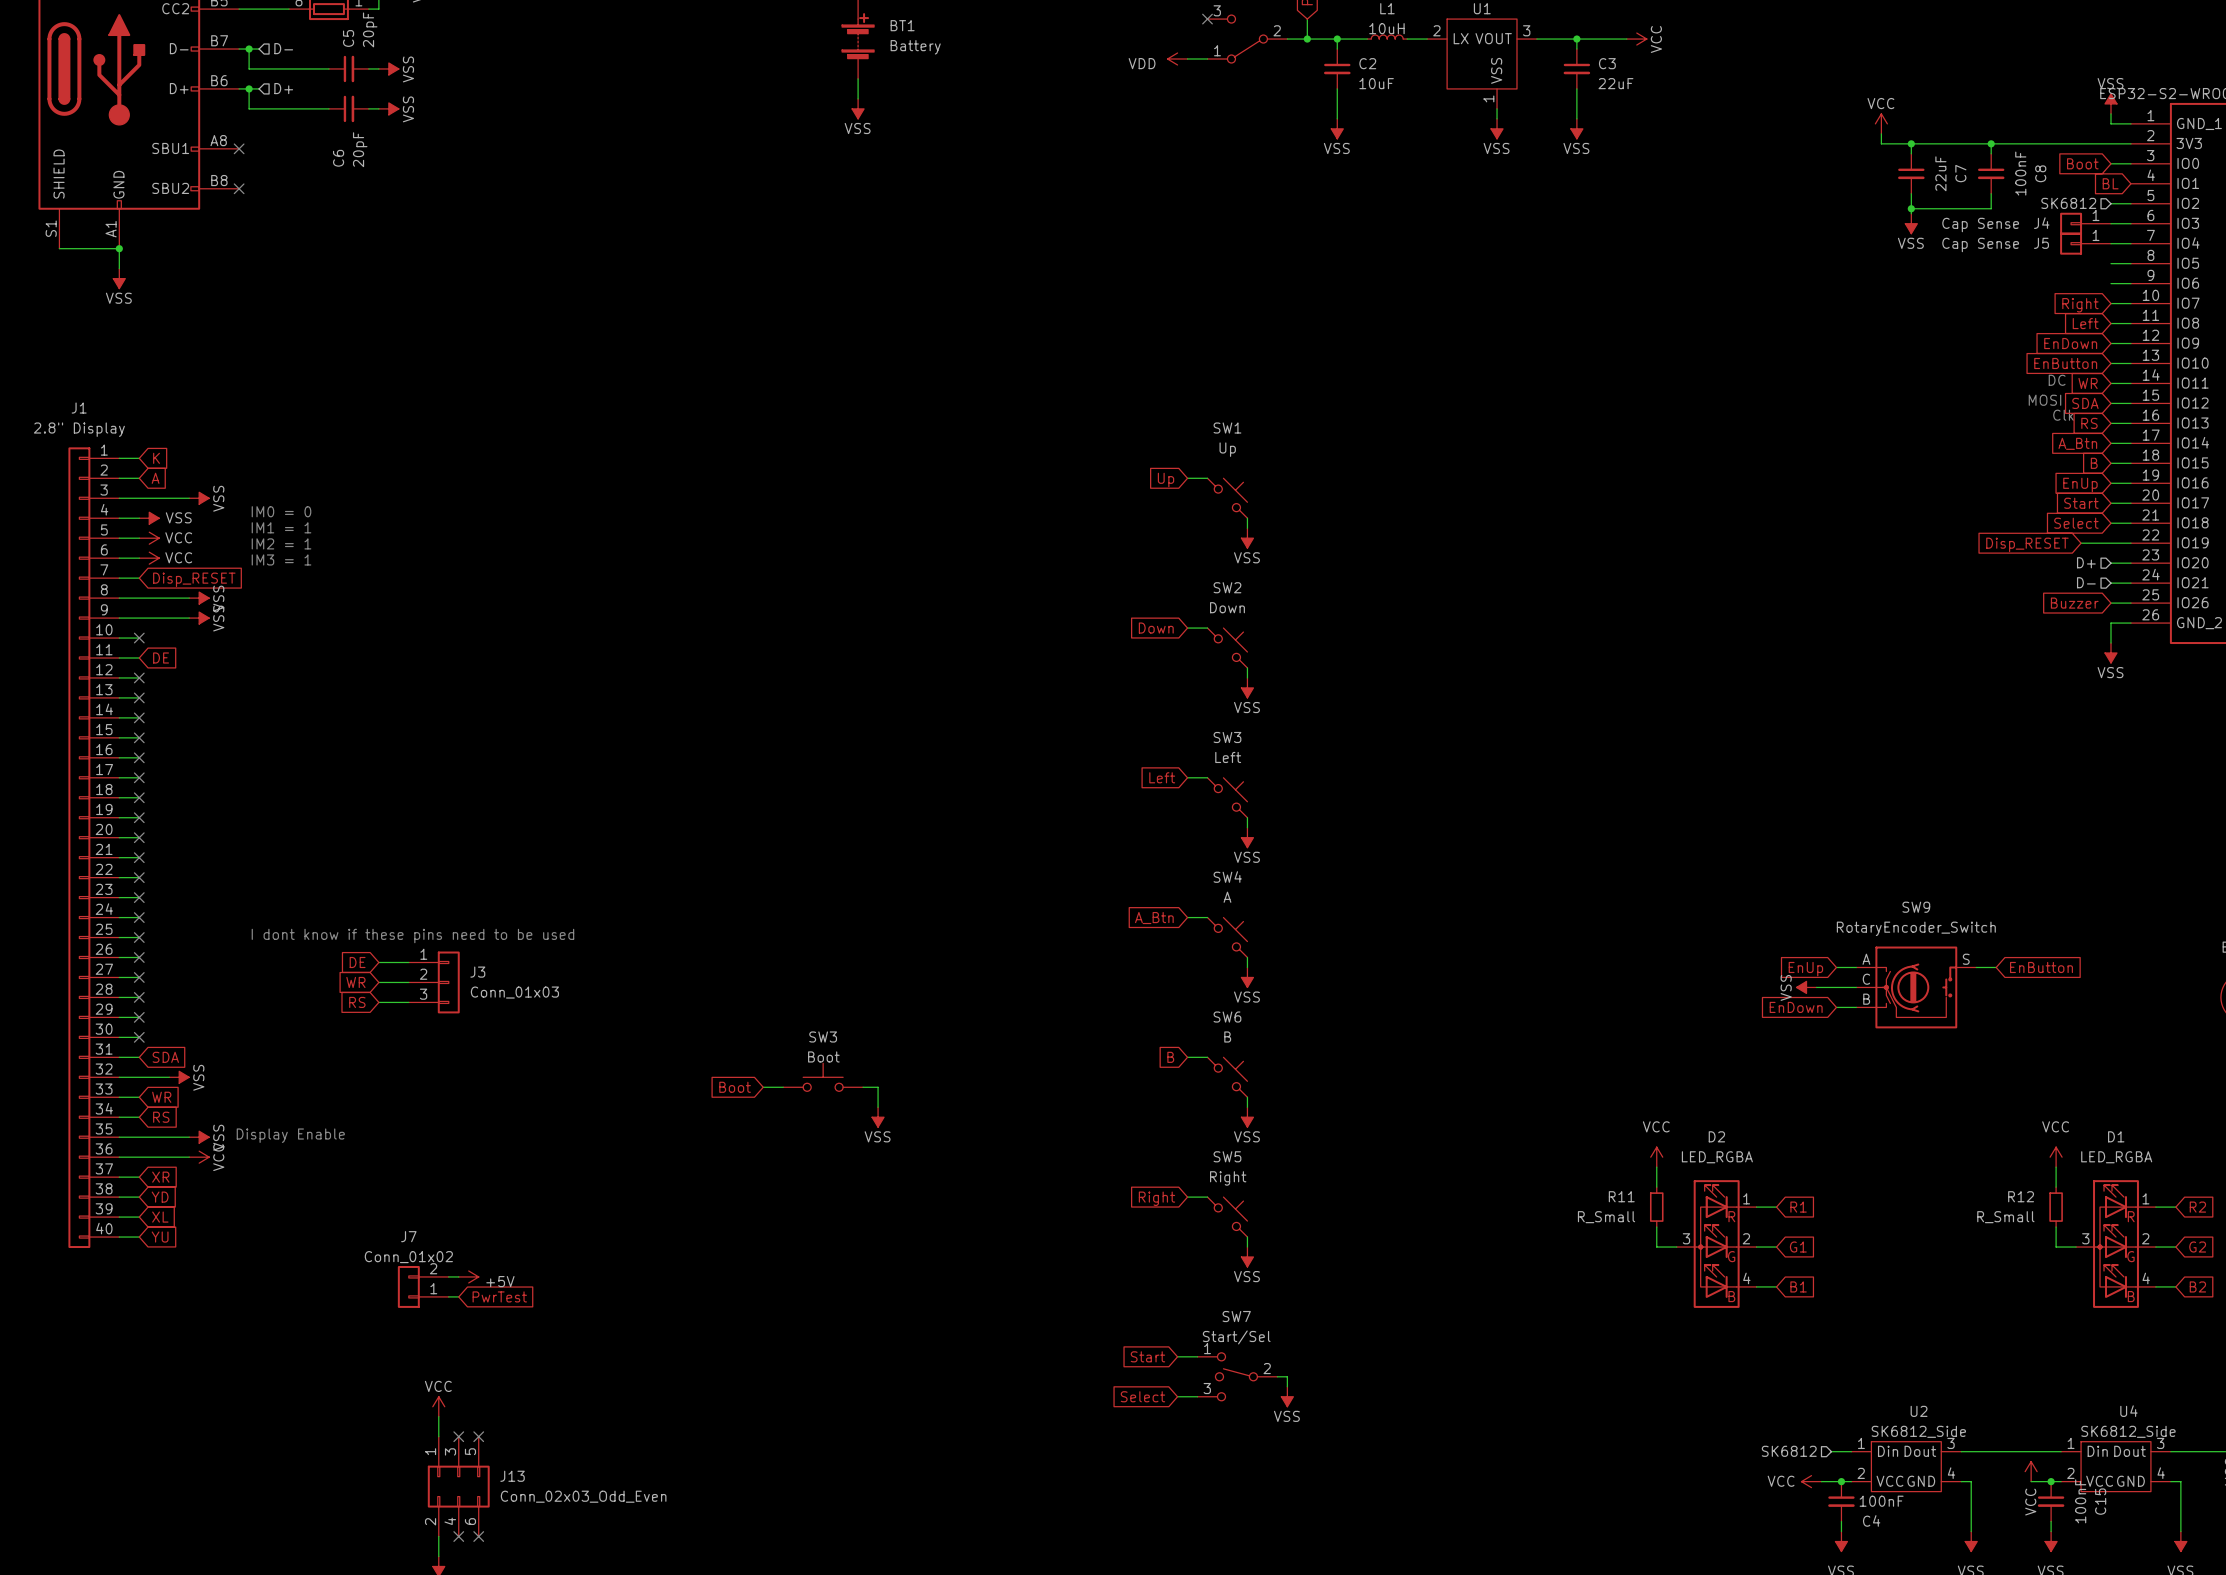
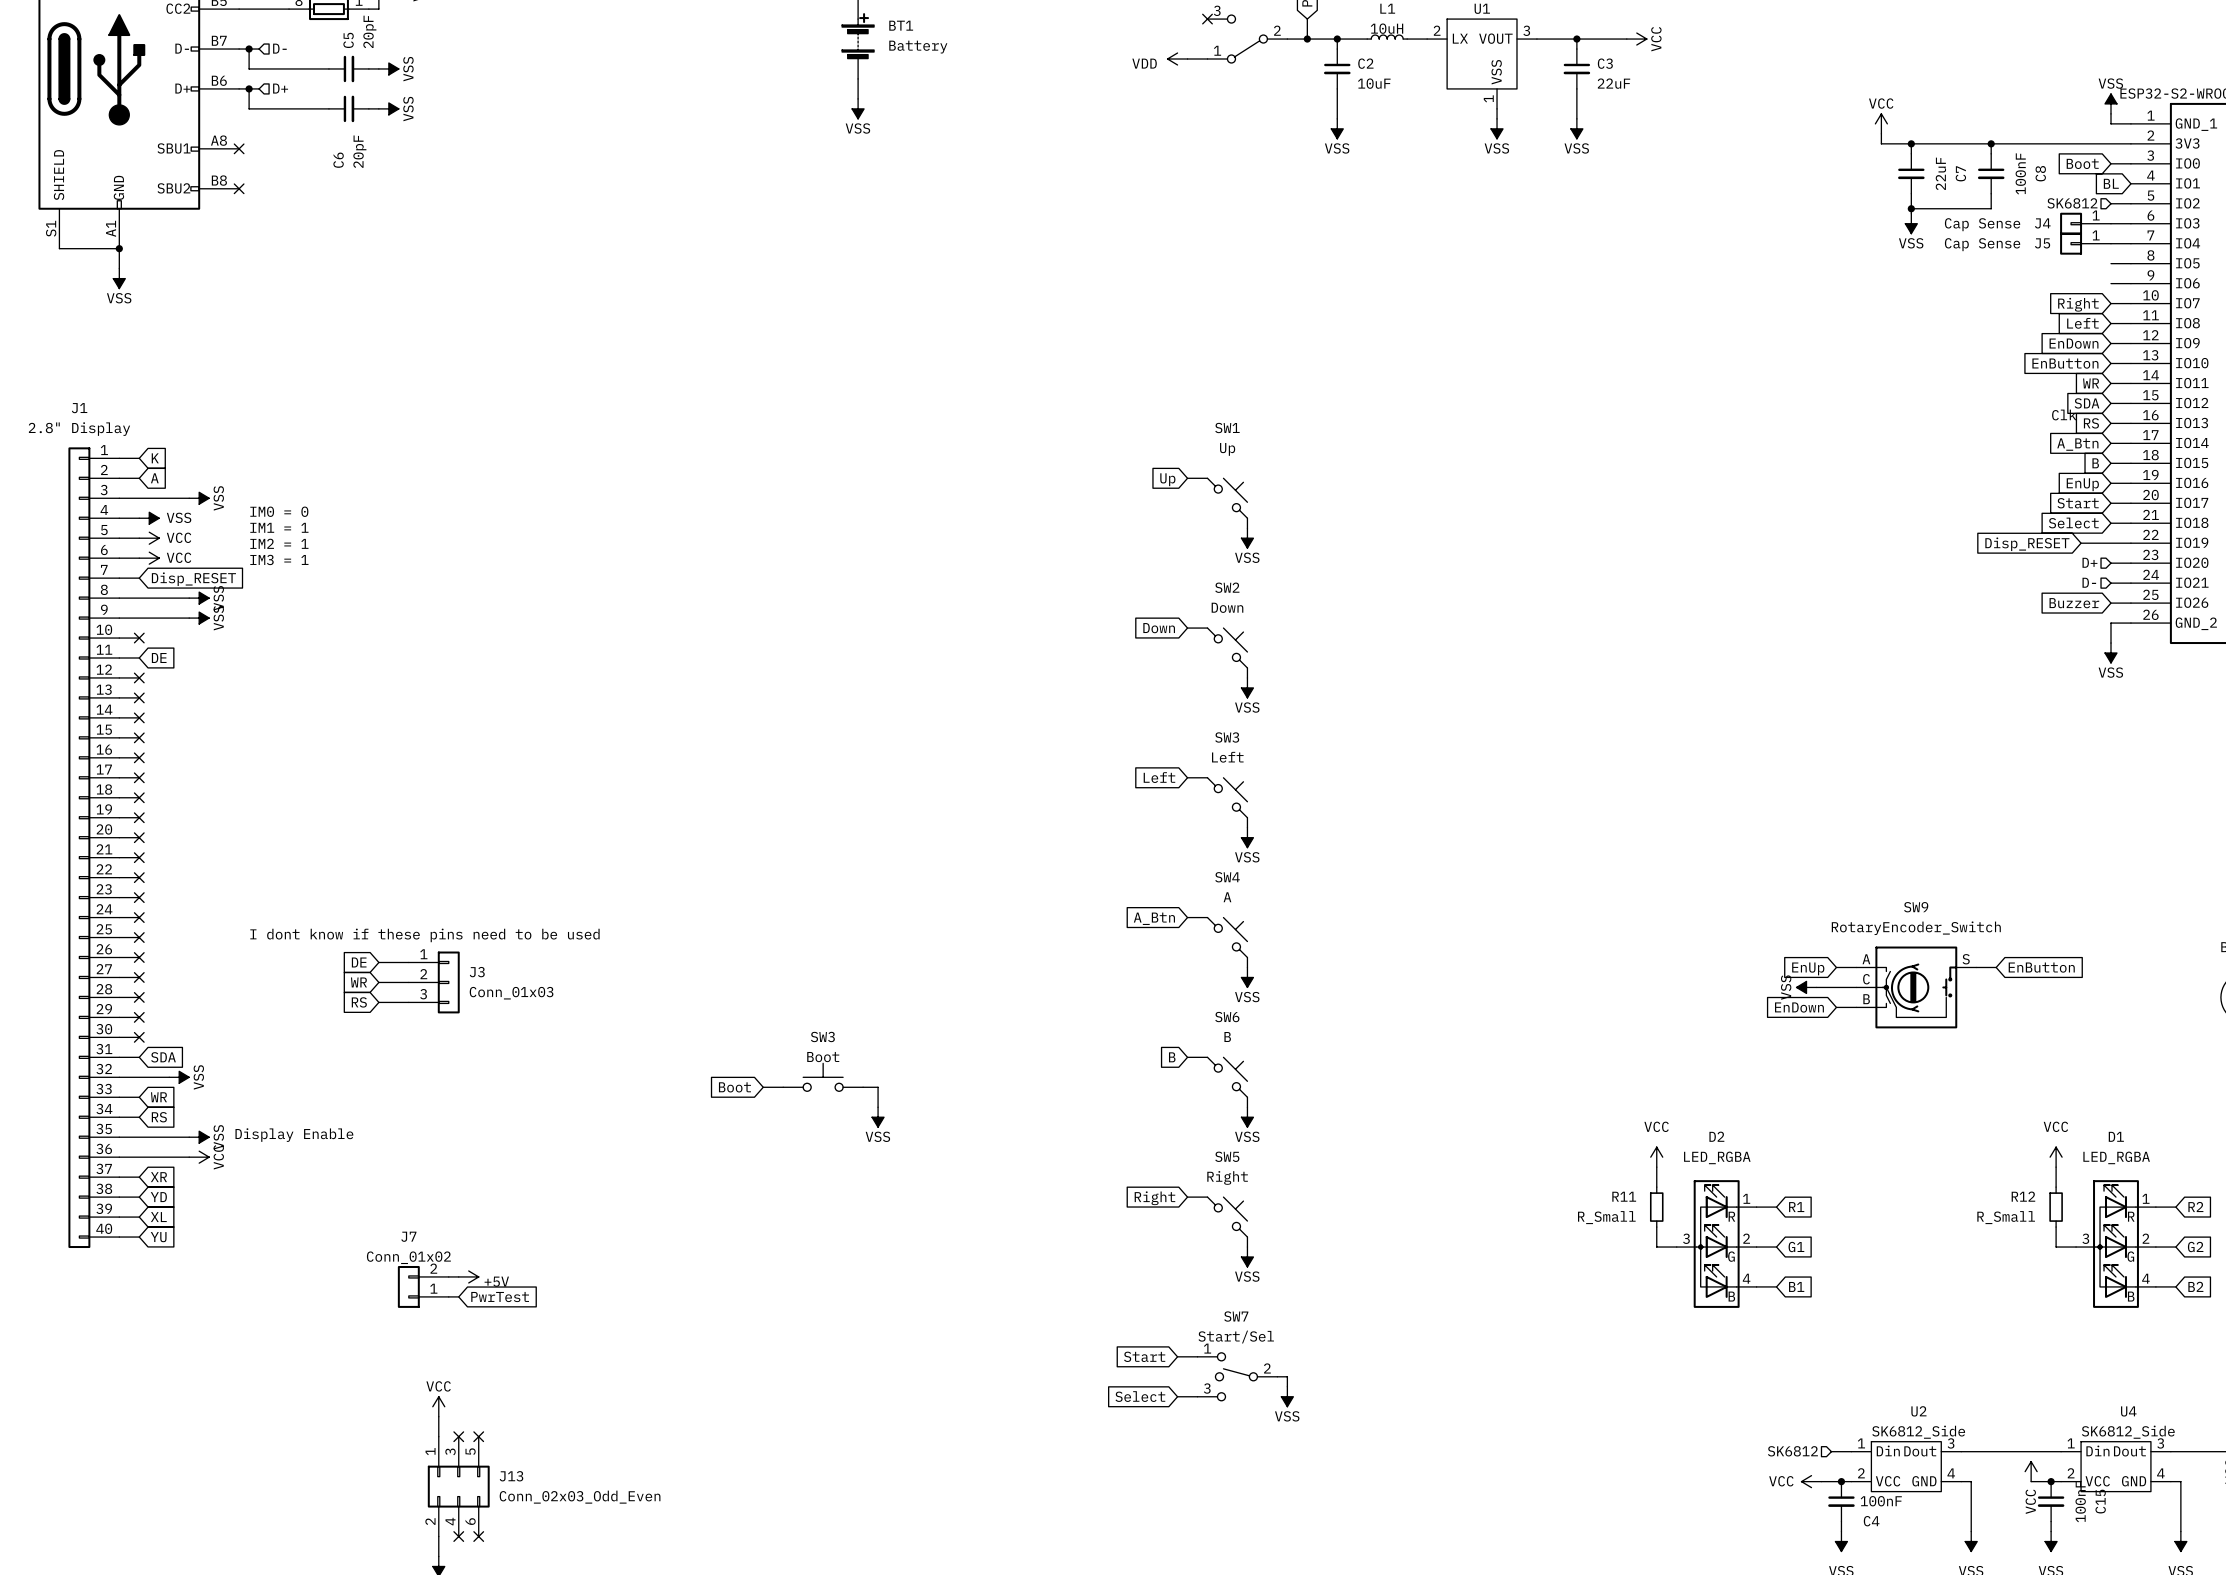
text: DC (2057, 380) -> none
text: MOSI (2044, 400) -> none

